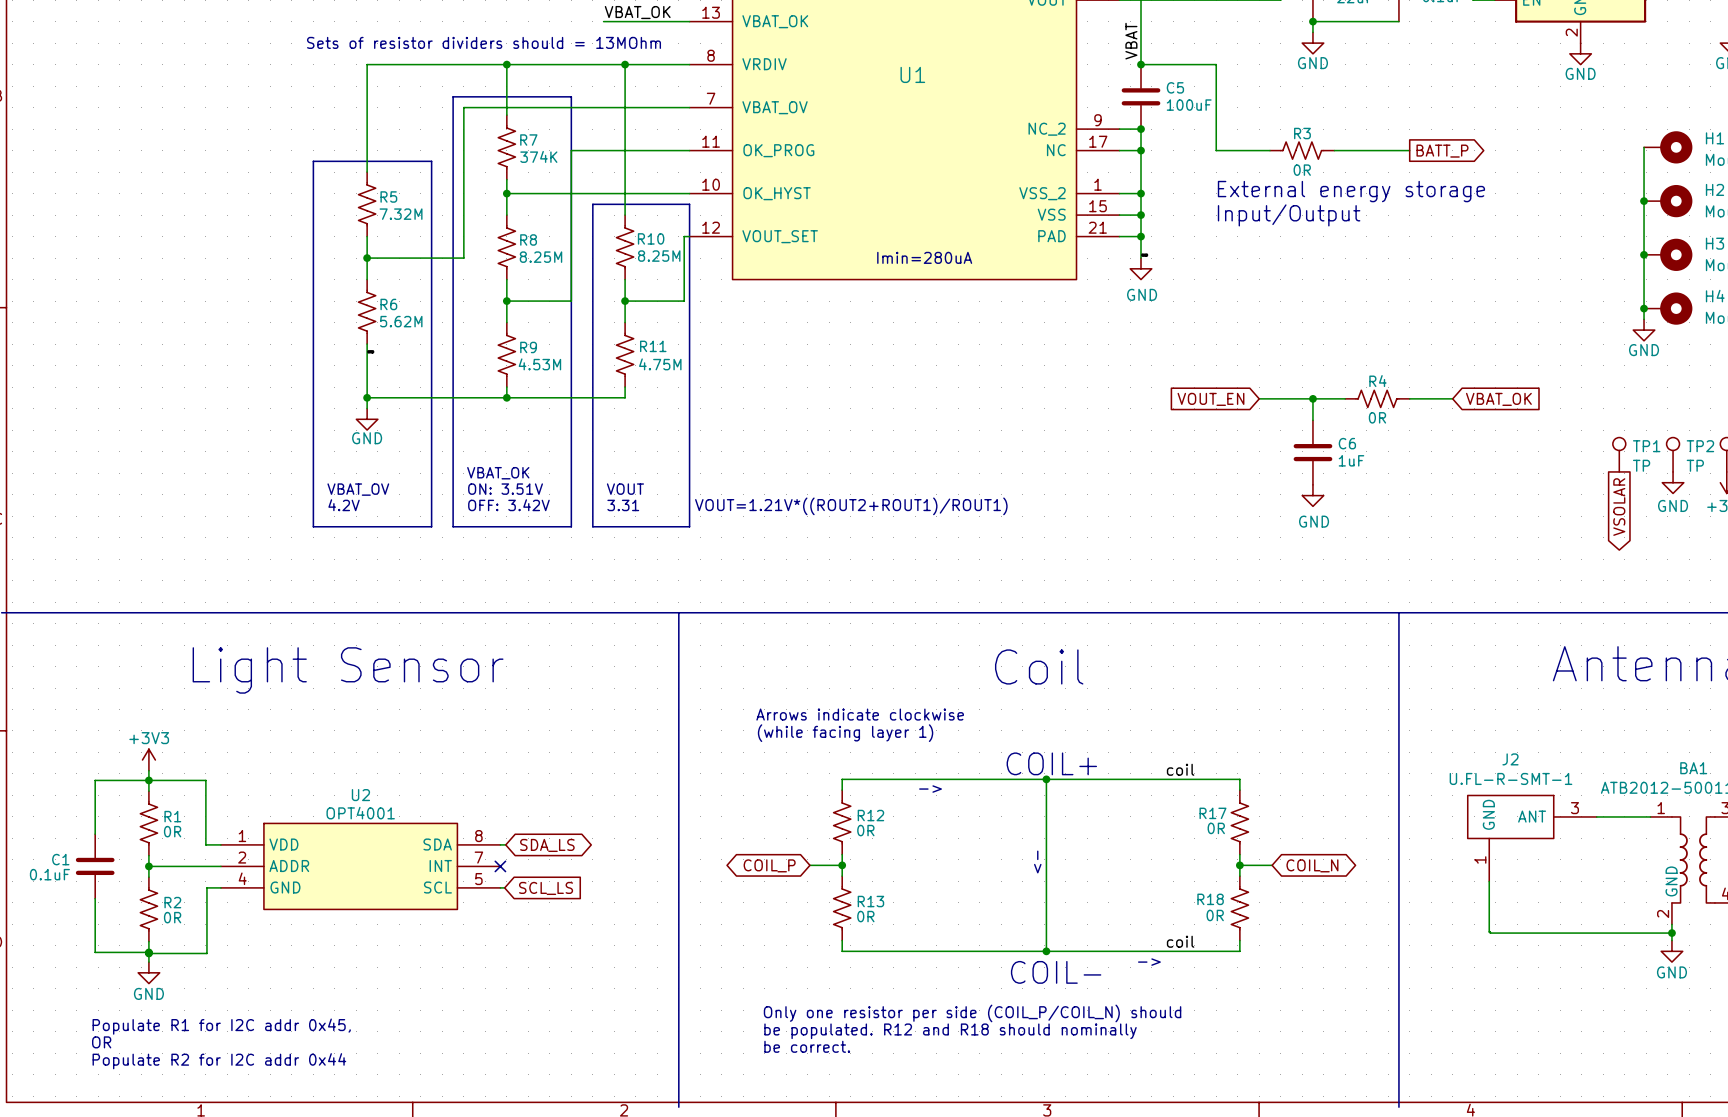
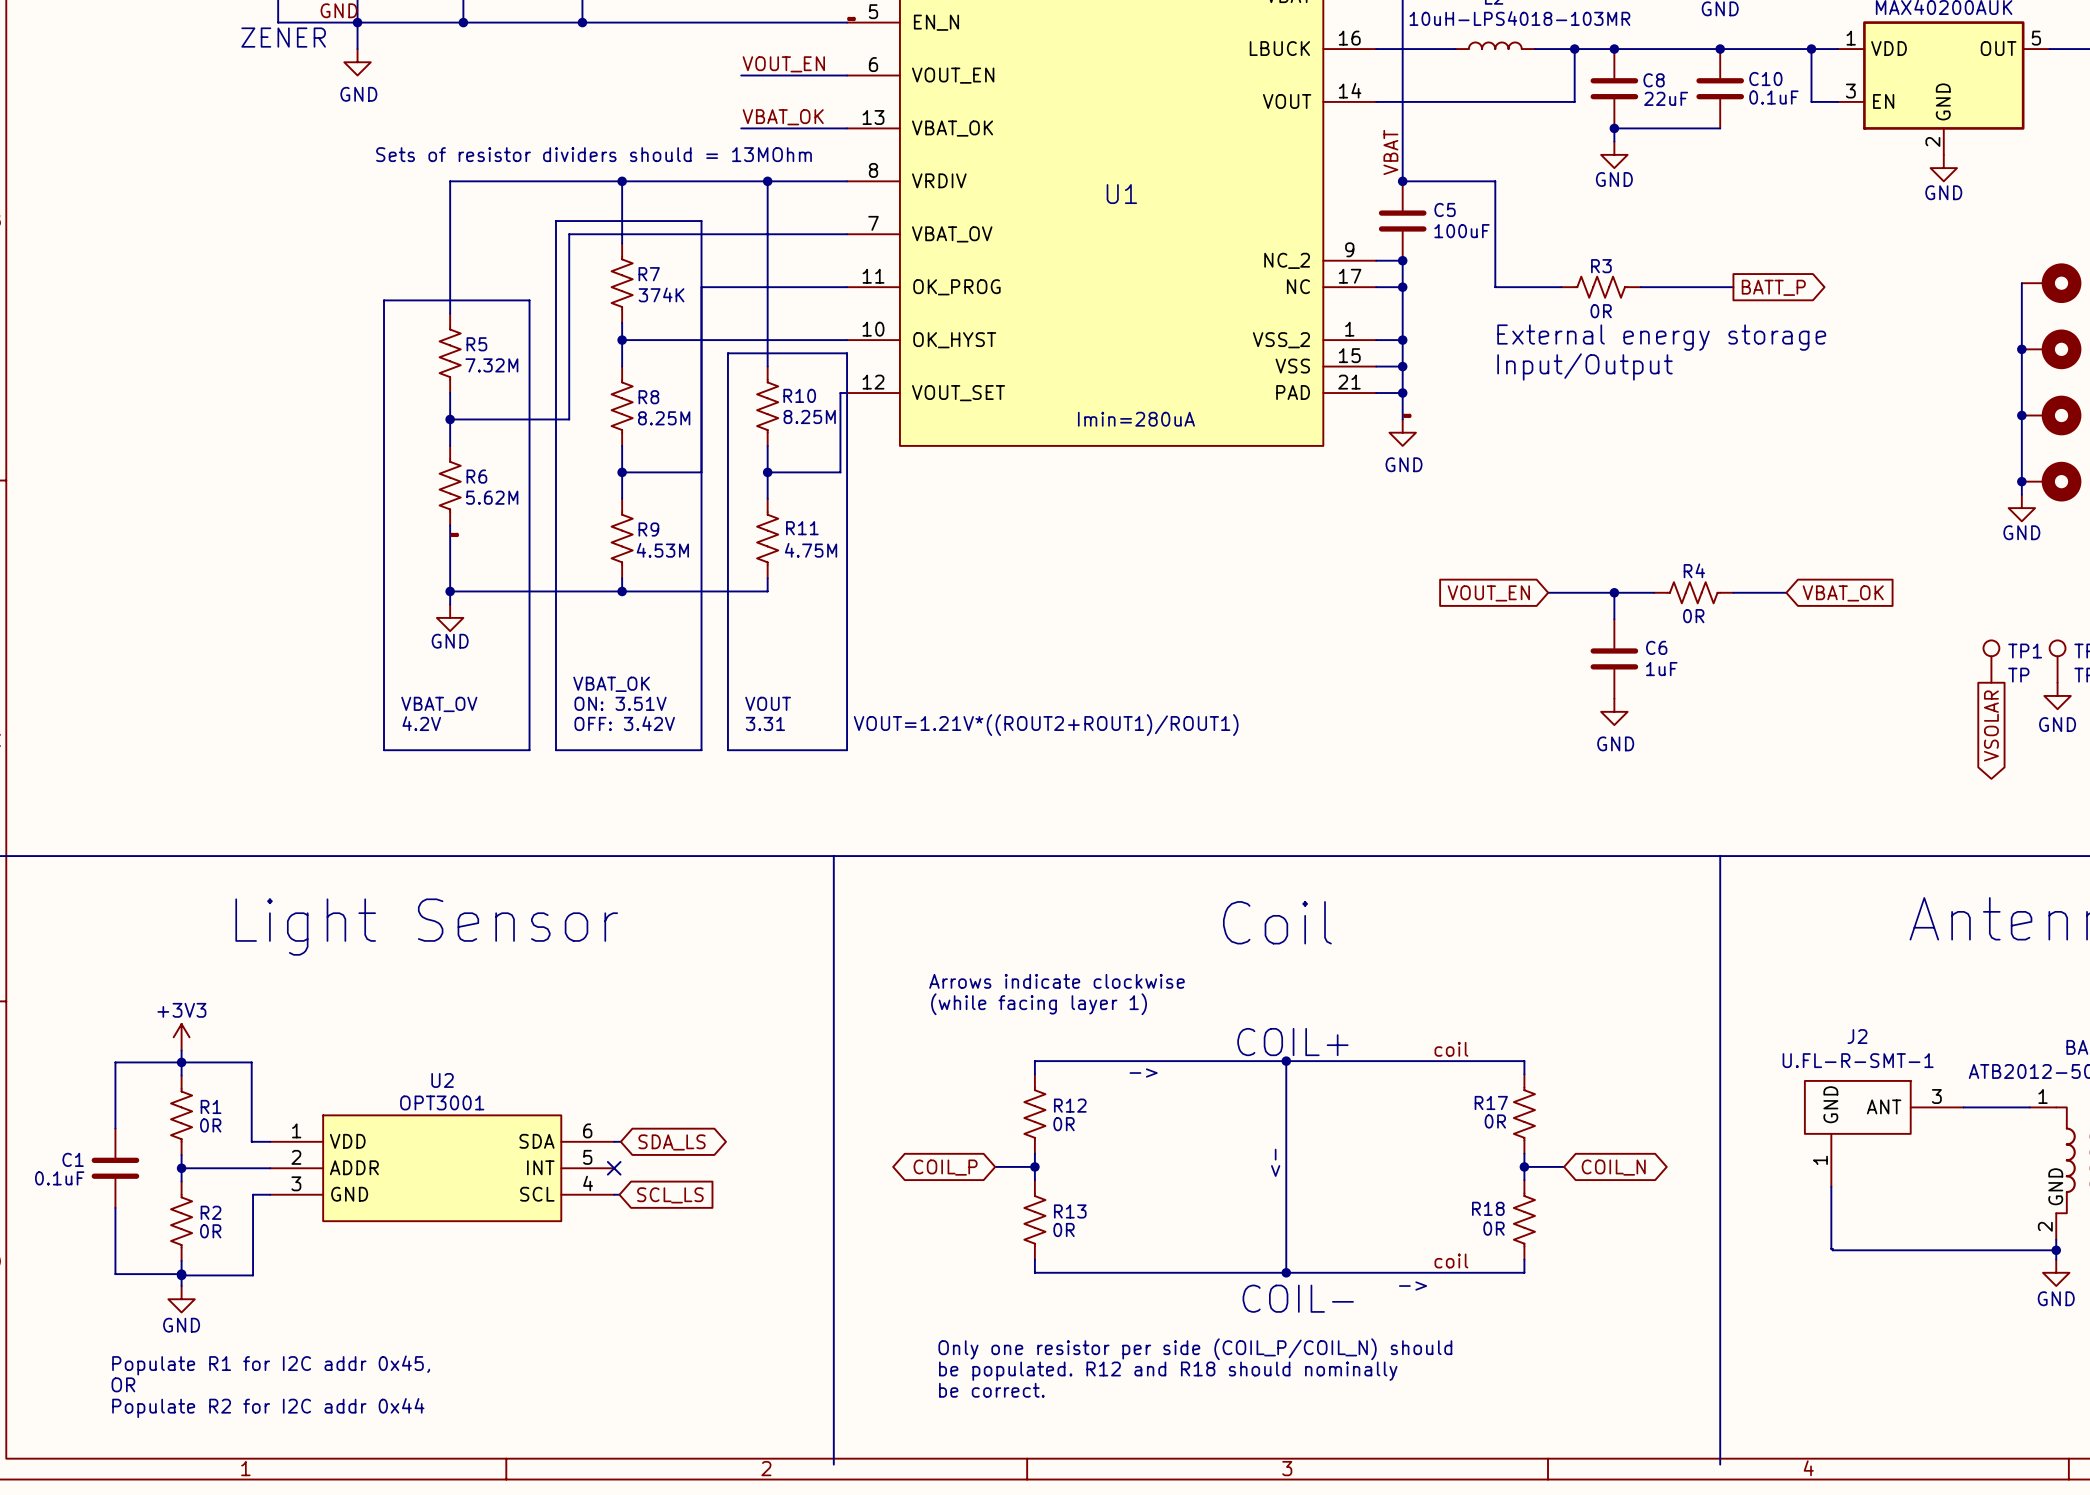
U2 value: OPT4001 (360, 813) -> OPT3001 (442, 1102)
U2 pin number: 8 (478, 836) -> 6 (587, 1130)
U2 pin number: 7 (478, 857) -> 5 (587, 1157)
U2 pin number: 4 (242, 878) -> 3 (296, 1183)
U2 pin number: 5 (478, 879) -> 4 (588, 1183)

